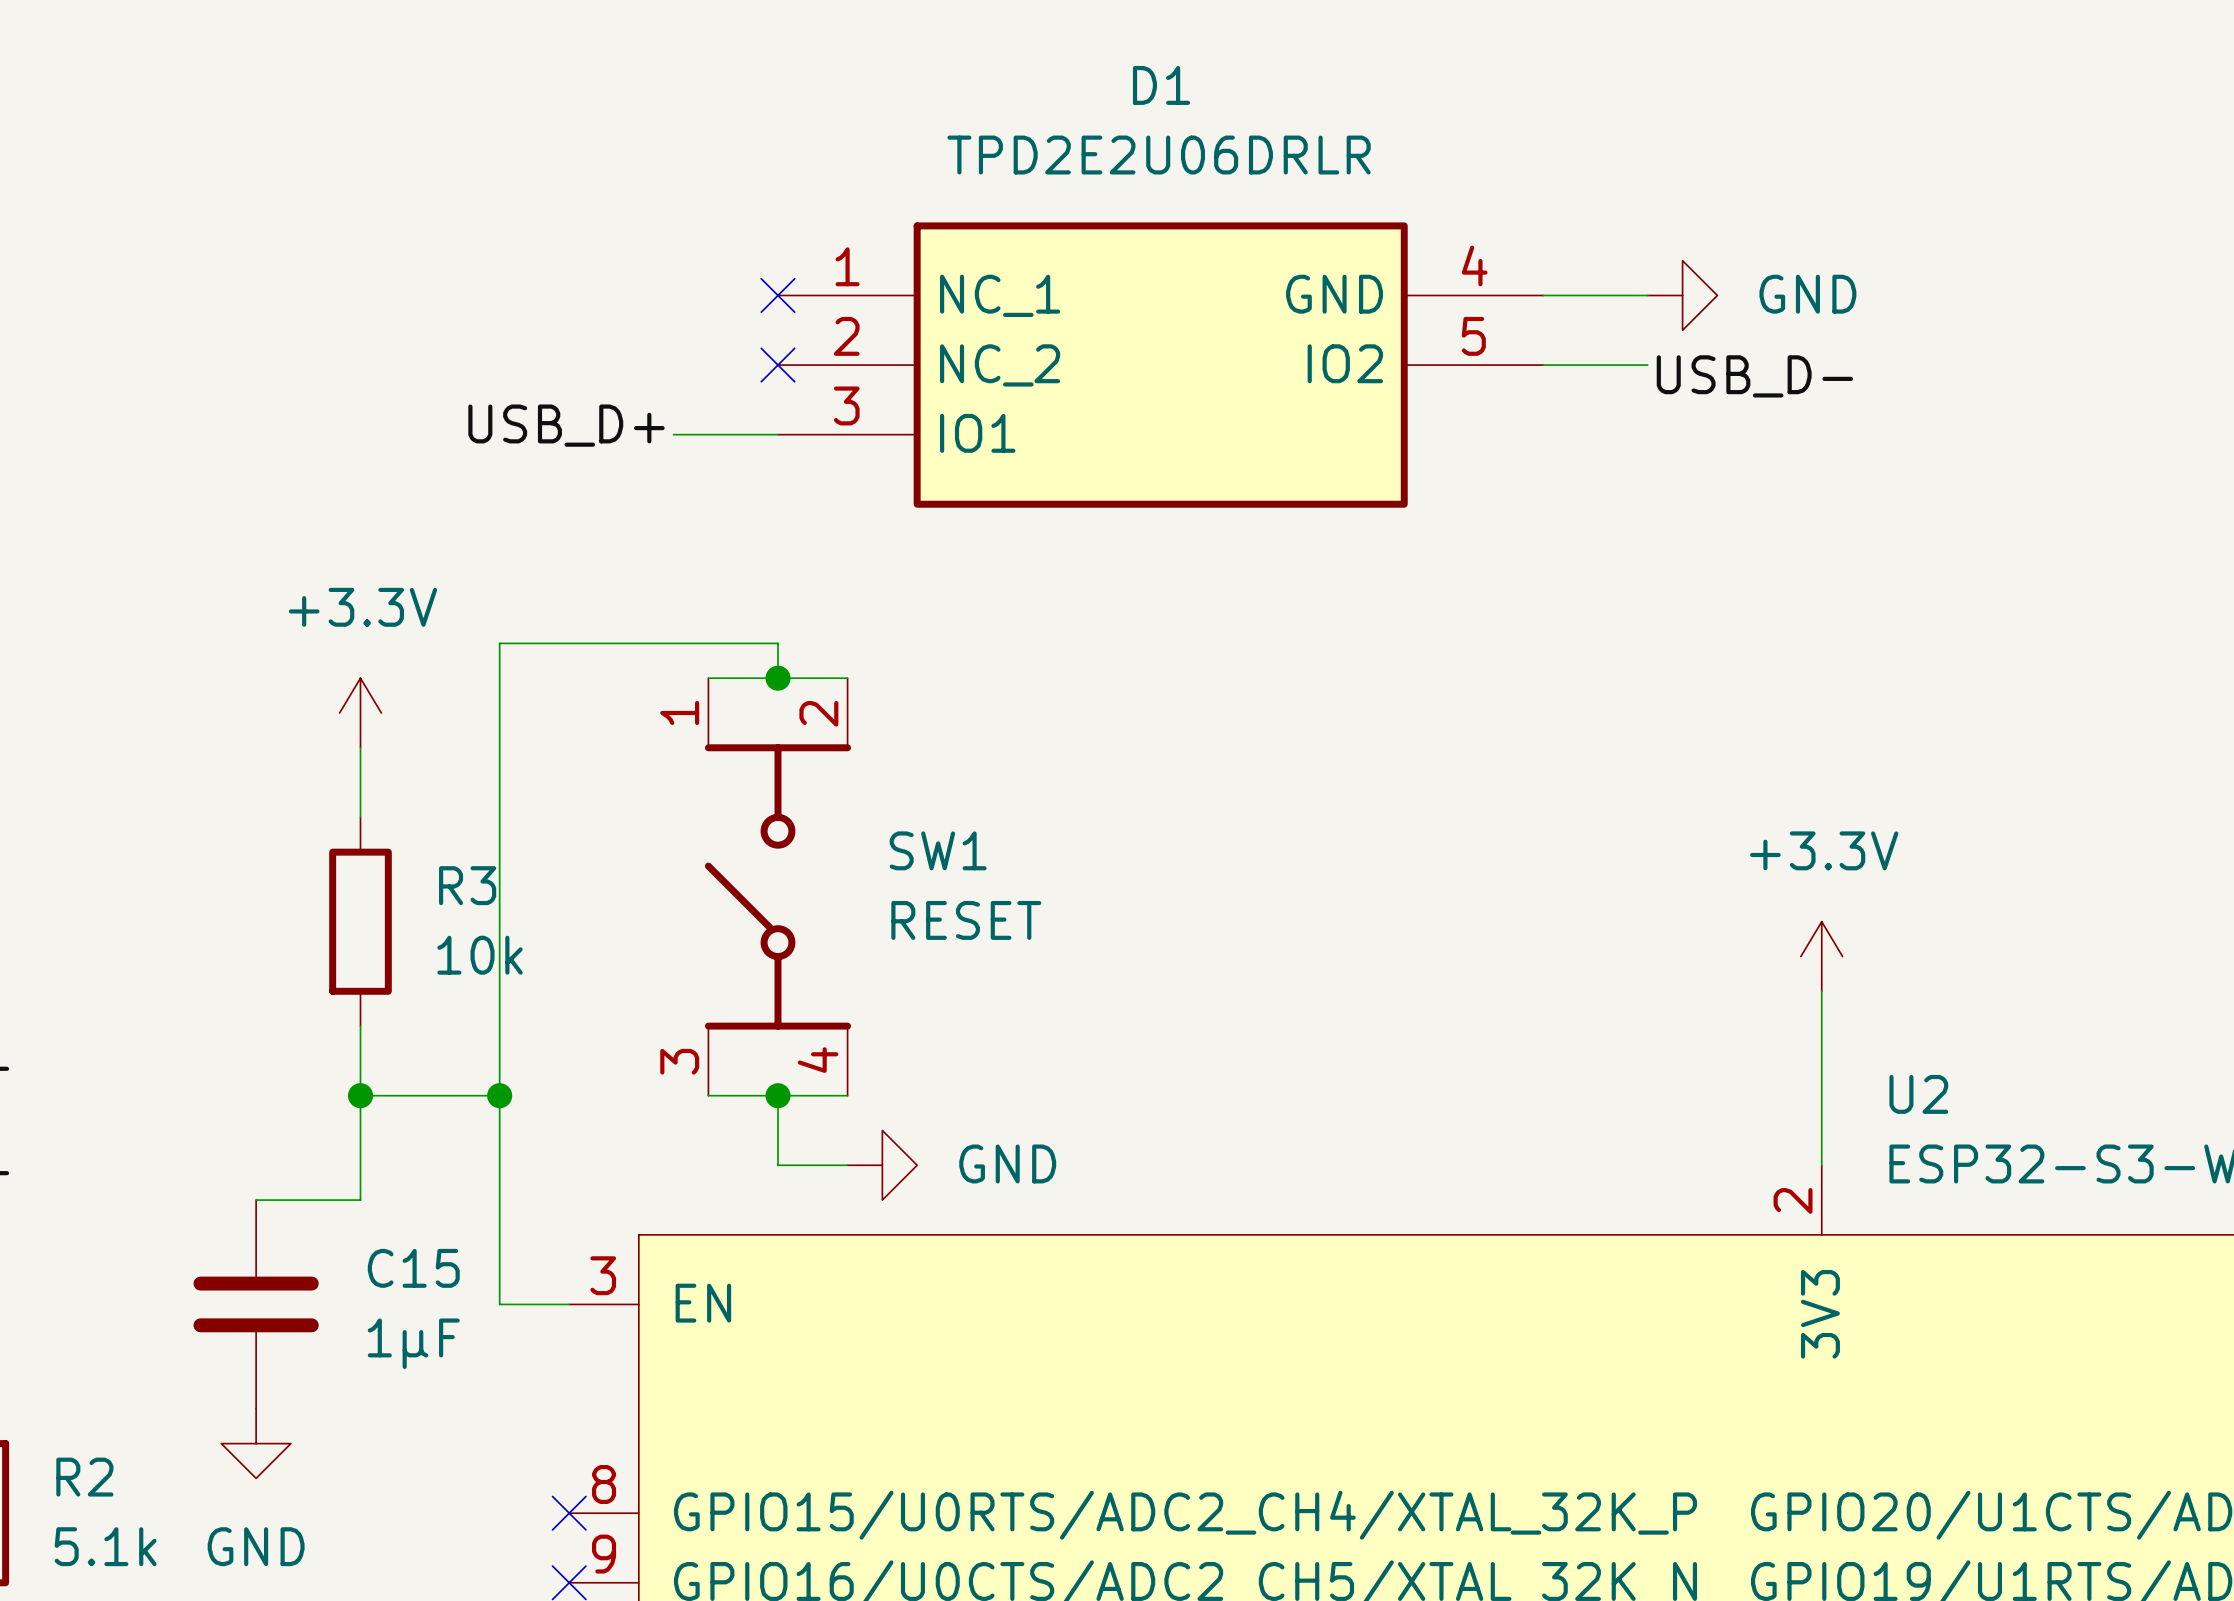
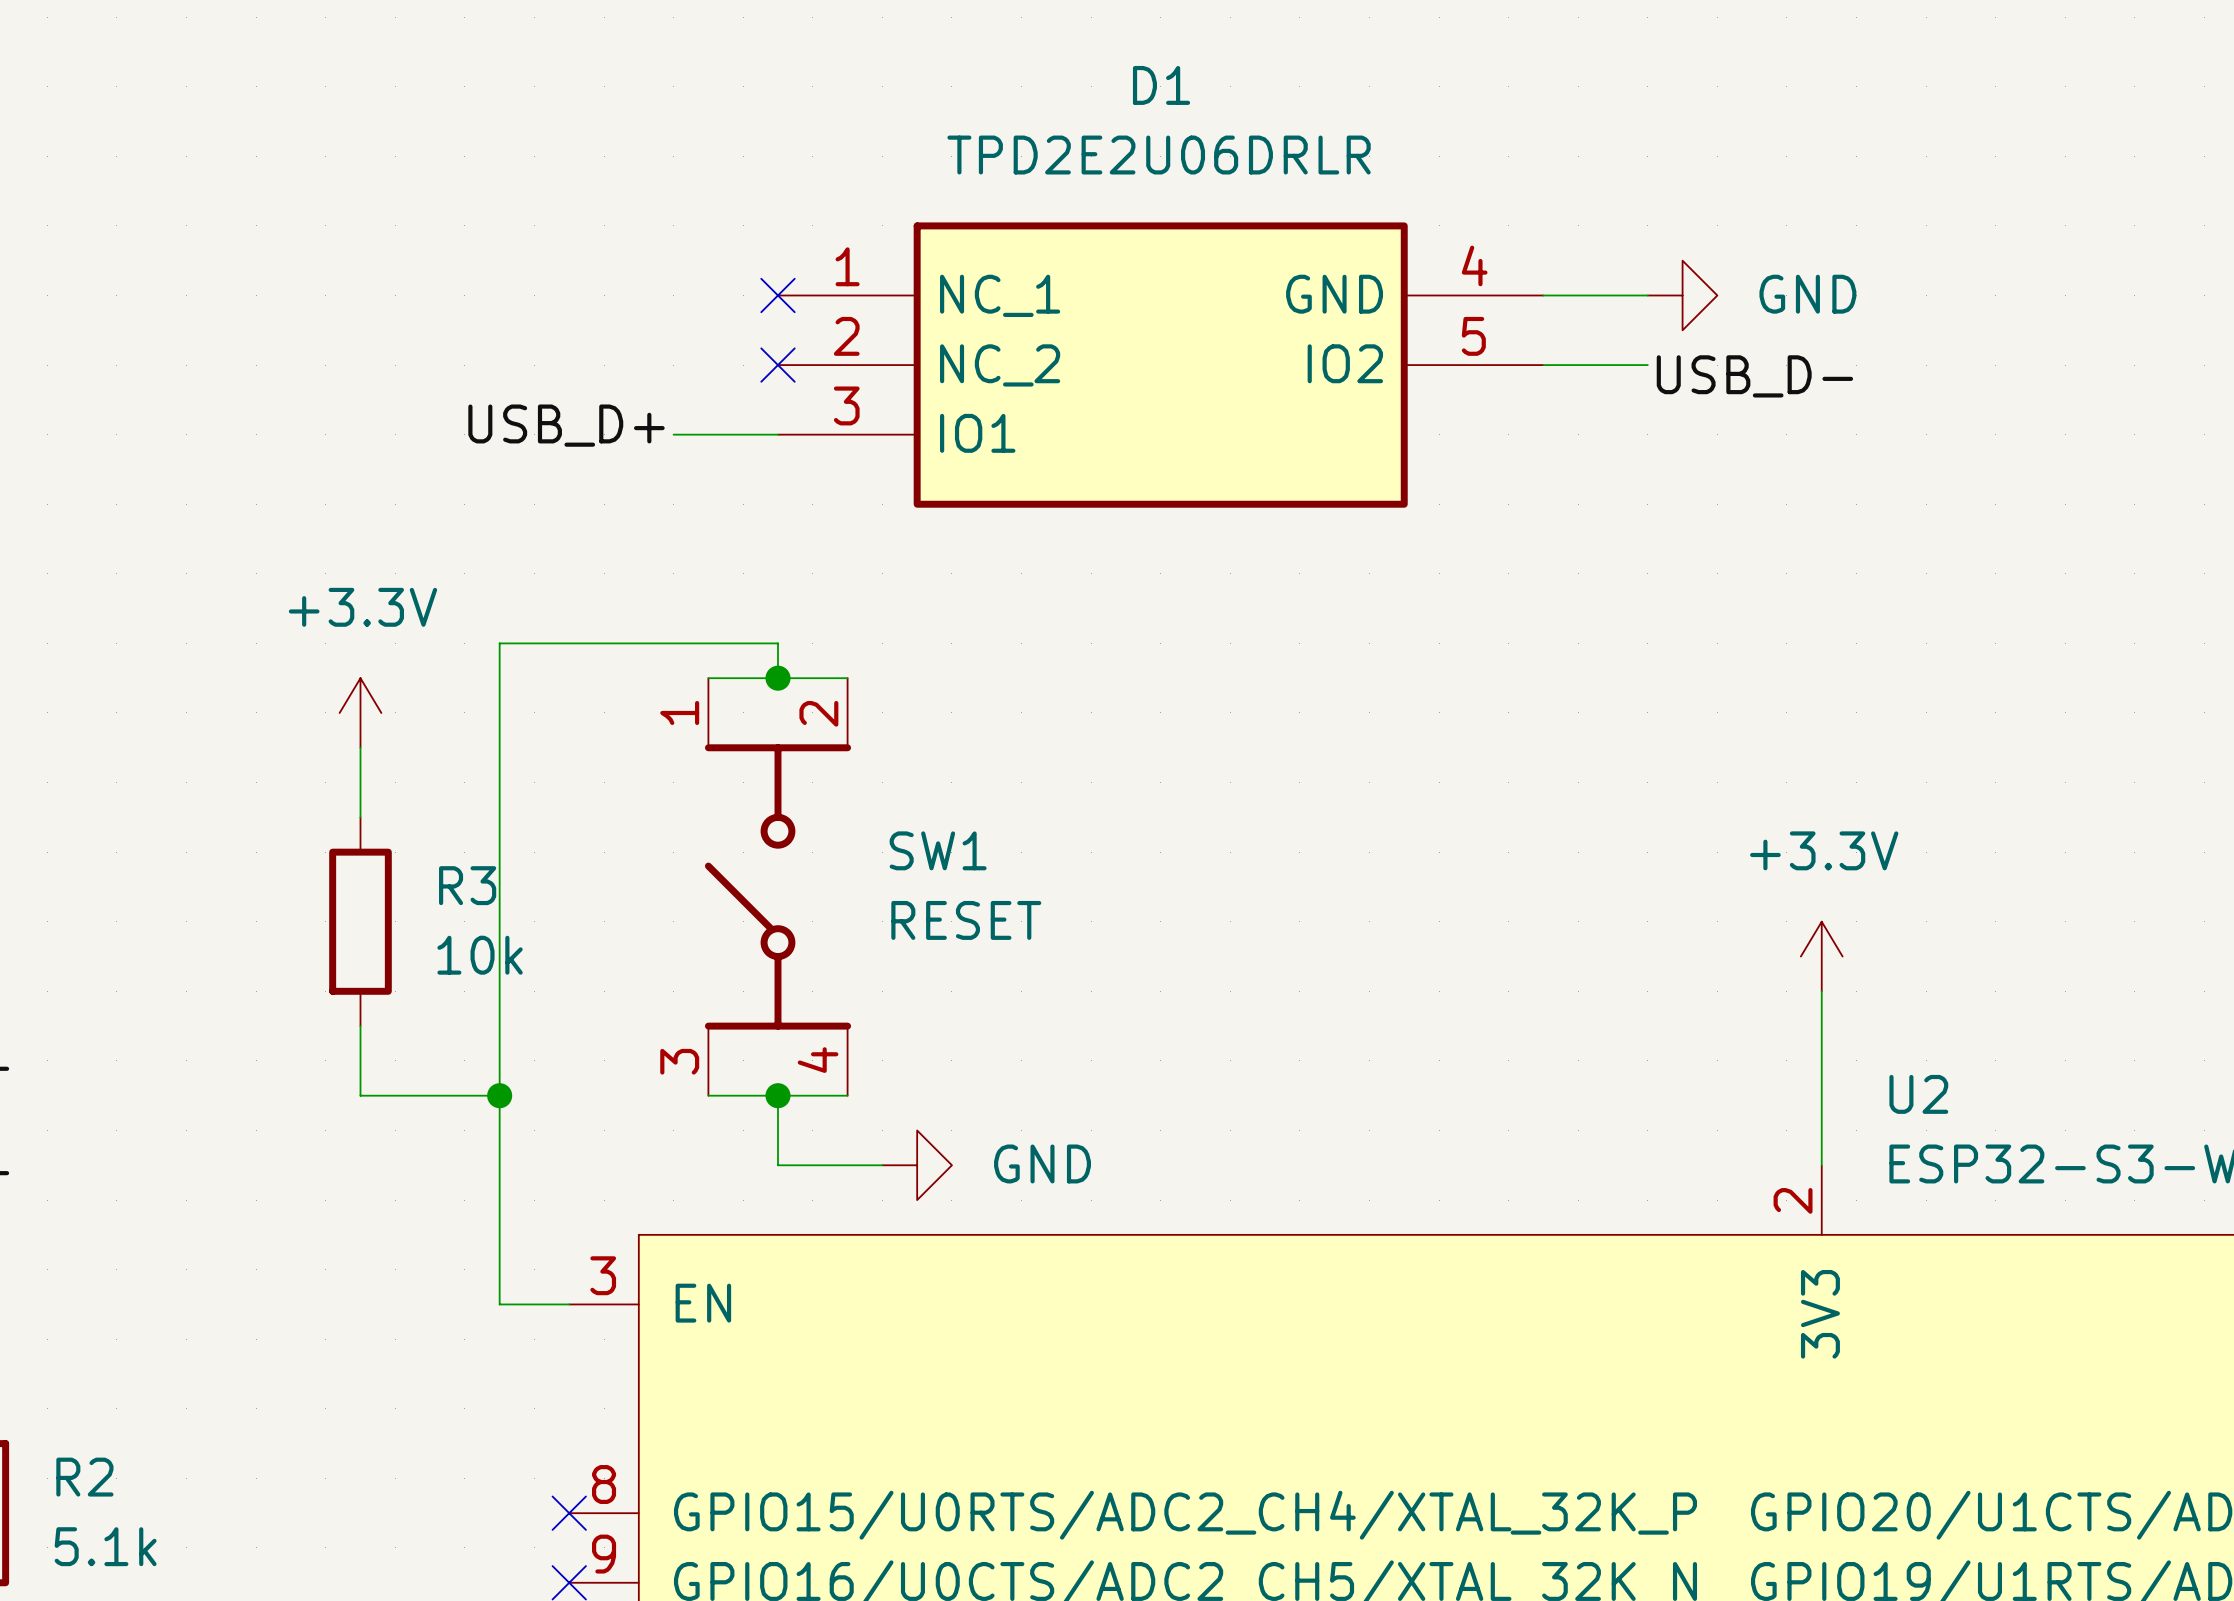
wire: (360, 1095) (360, 1200) (256, 1200) -> none
junction: (360, 1095) -> none
power symbol position: GND (882, 1165) -> GND (917, 1165)
C15: 1µF (256, 1304) -> none
power symbol: GND (256, 1443) -> none

